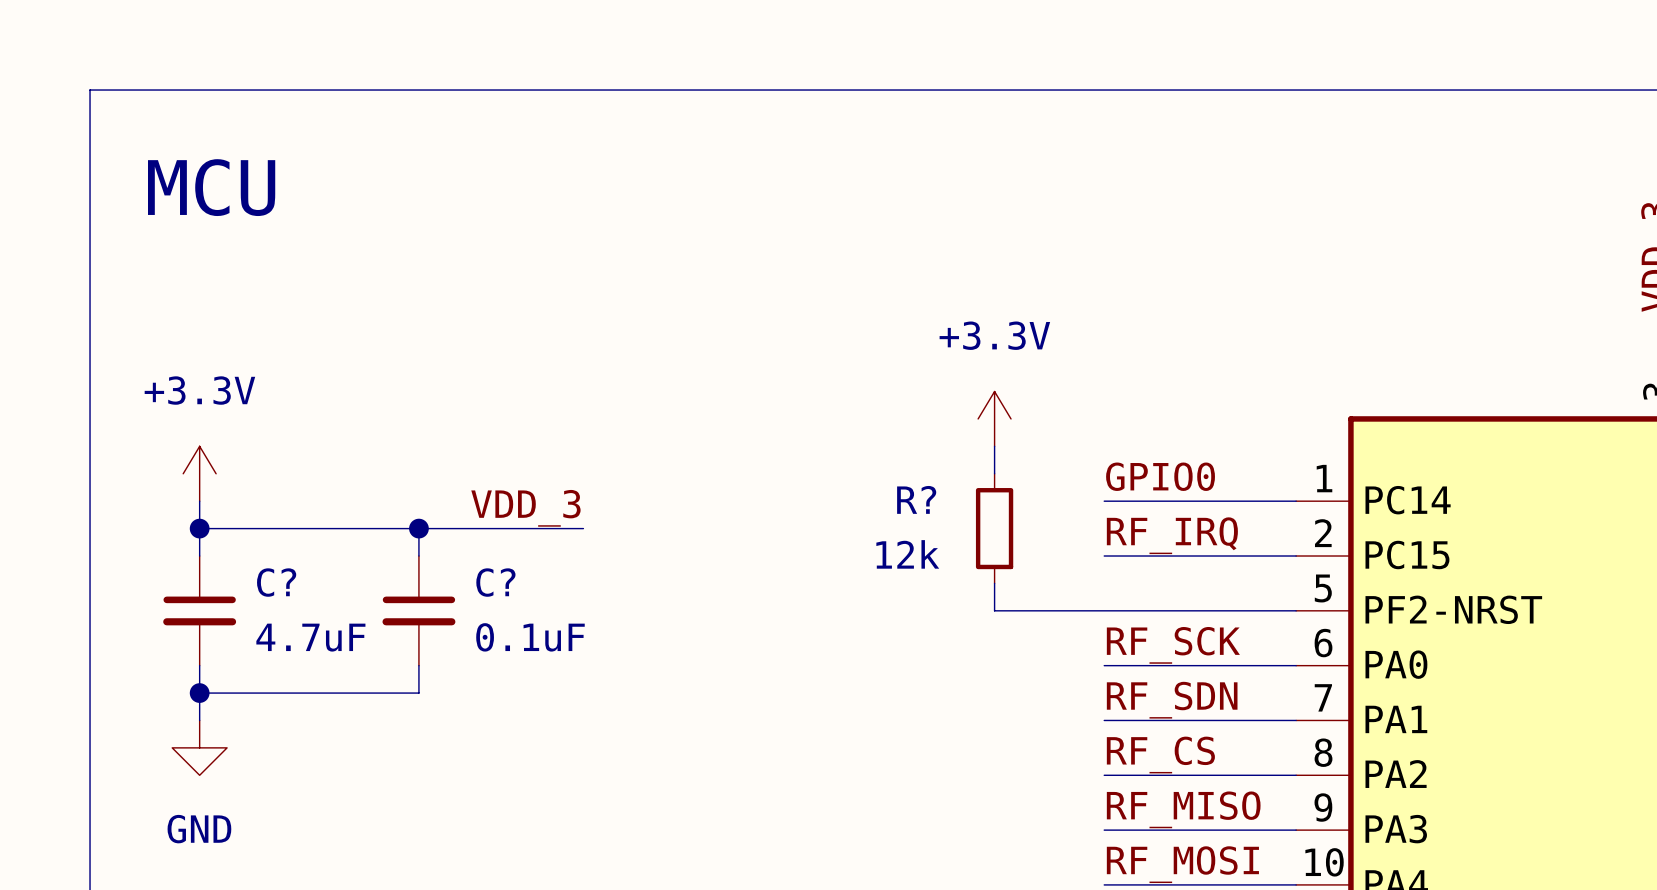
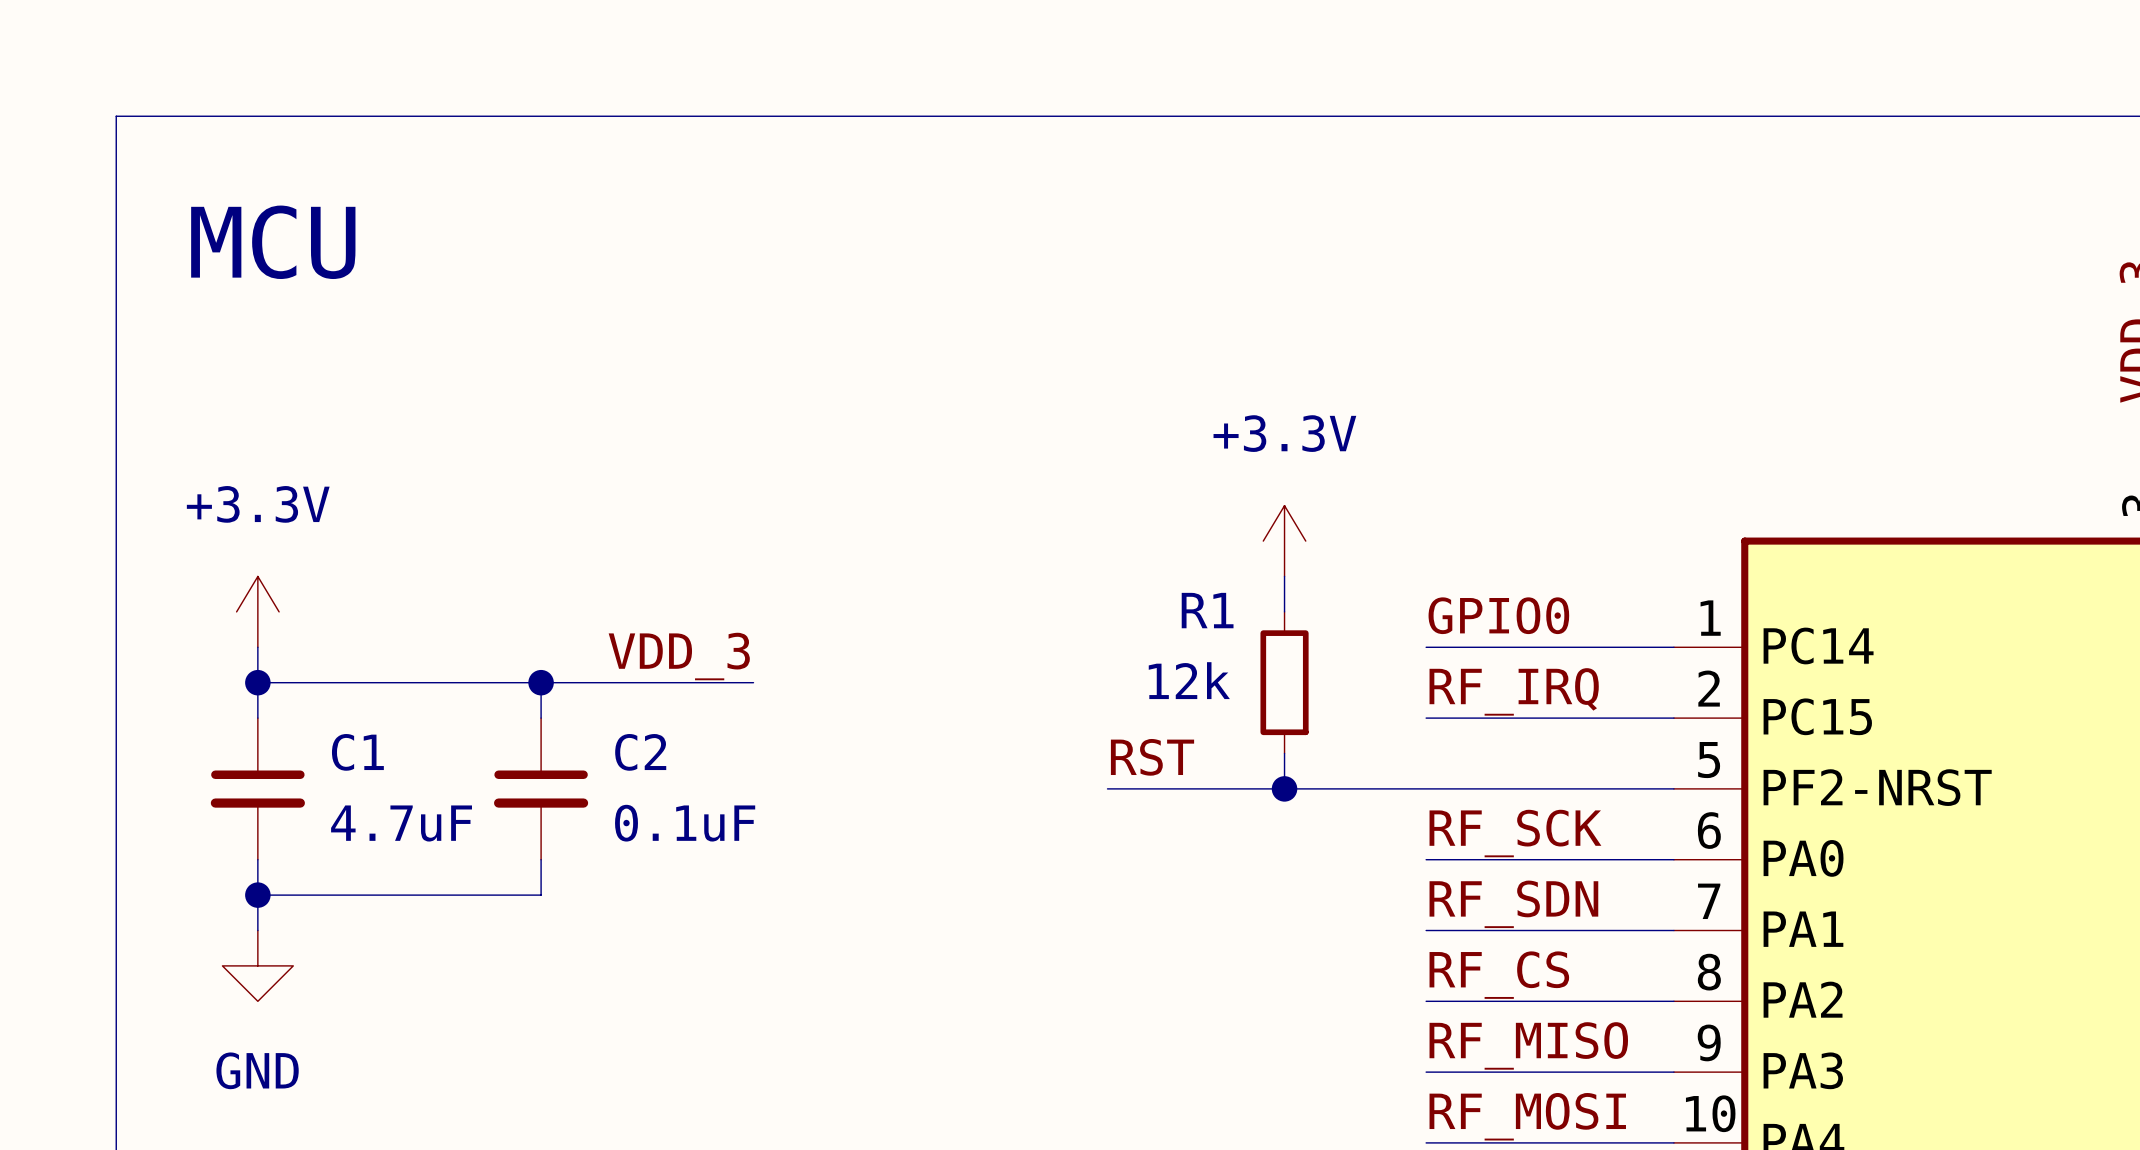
R? name: R? (916, 499) -> R1 (1207, 610)
R? value position: 12k (907, 554) -> 12k (1189, 680)
C? name: C? (276, 582) -> C1 (357, 752)
C? name: C? (495, 582) -> C2 (640, 752)
label: none -> RST (1152, 757)
wire: none -> (1107, 788) (1284, 788)
junction: none -> (1284, 788)

